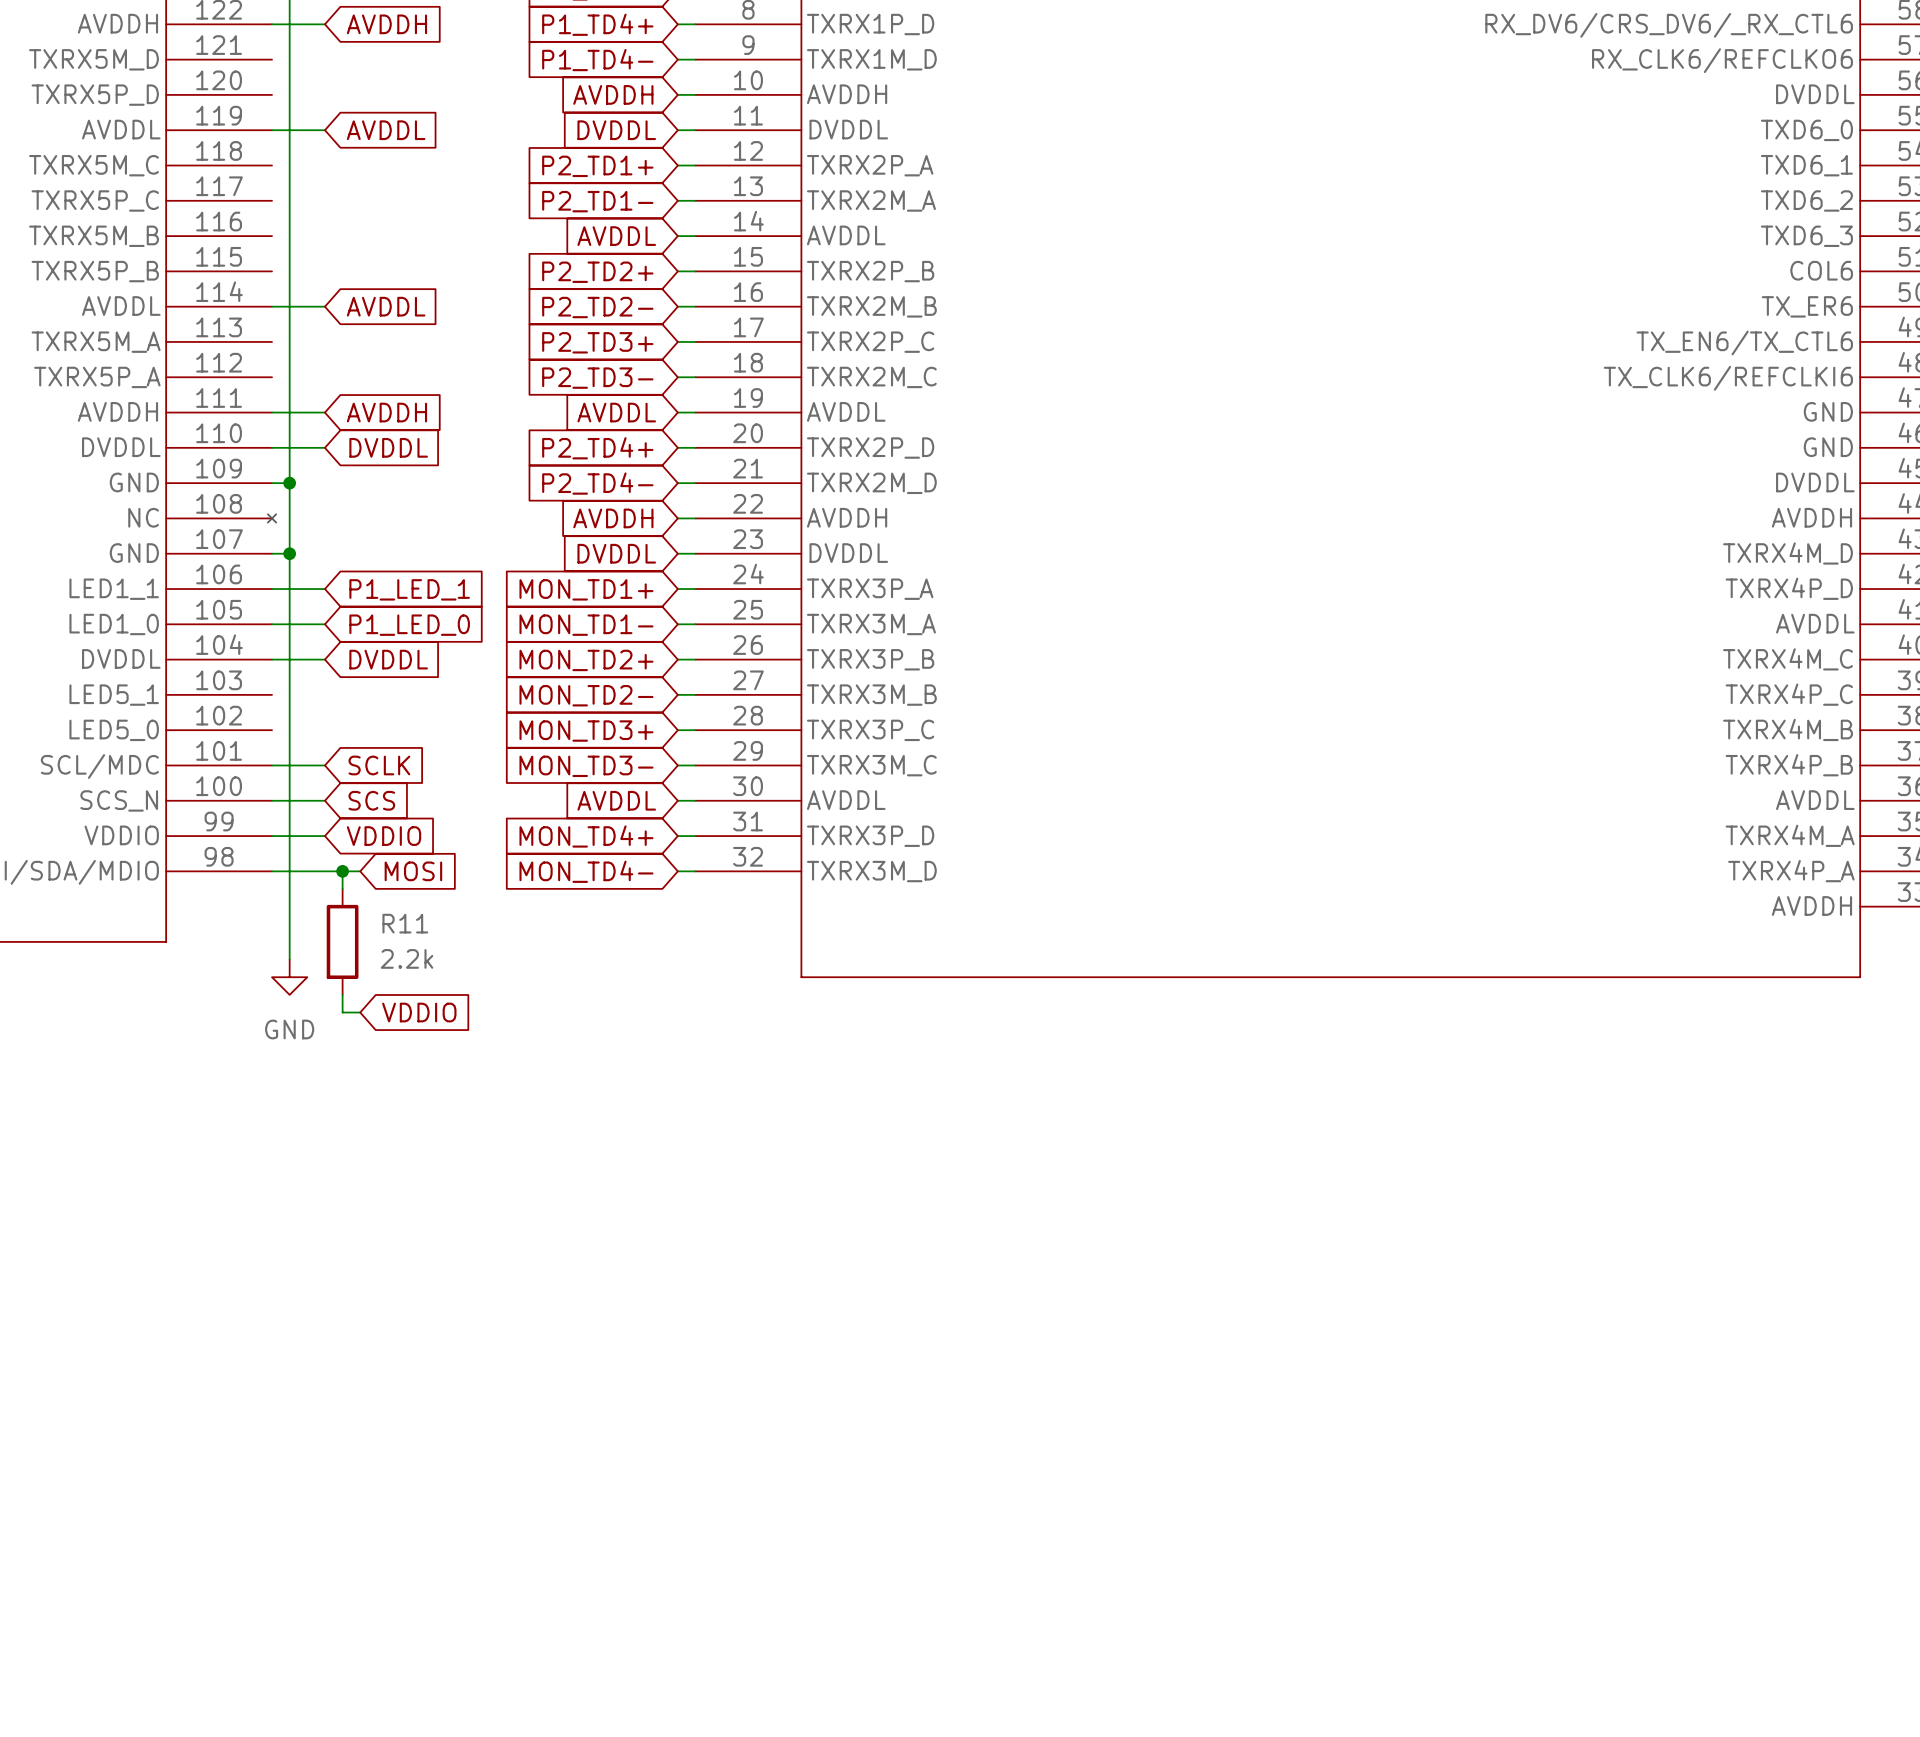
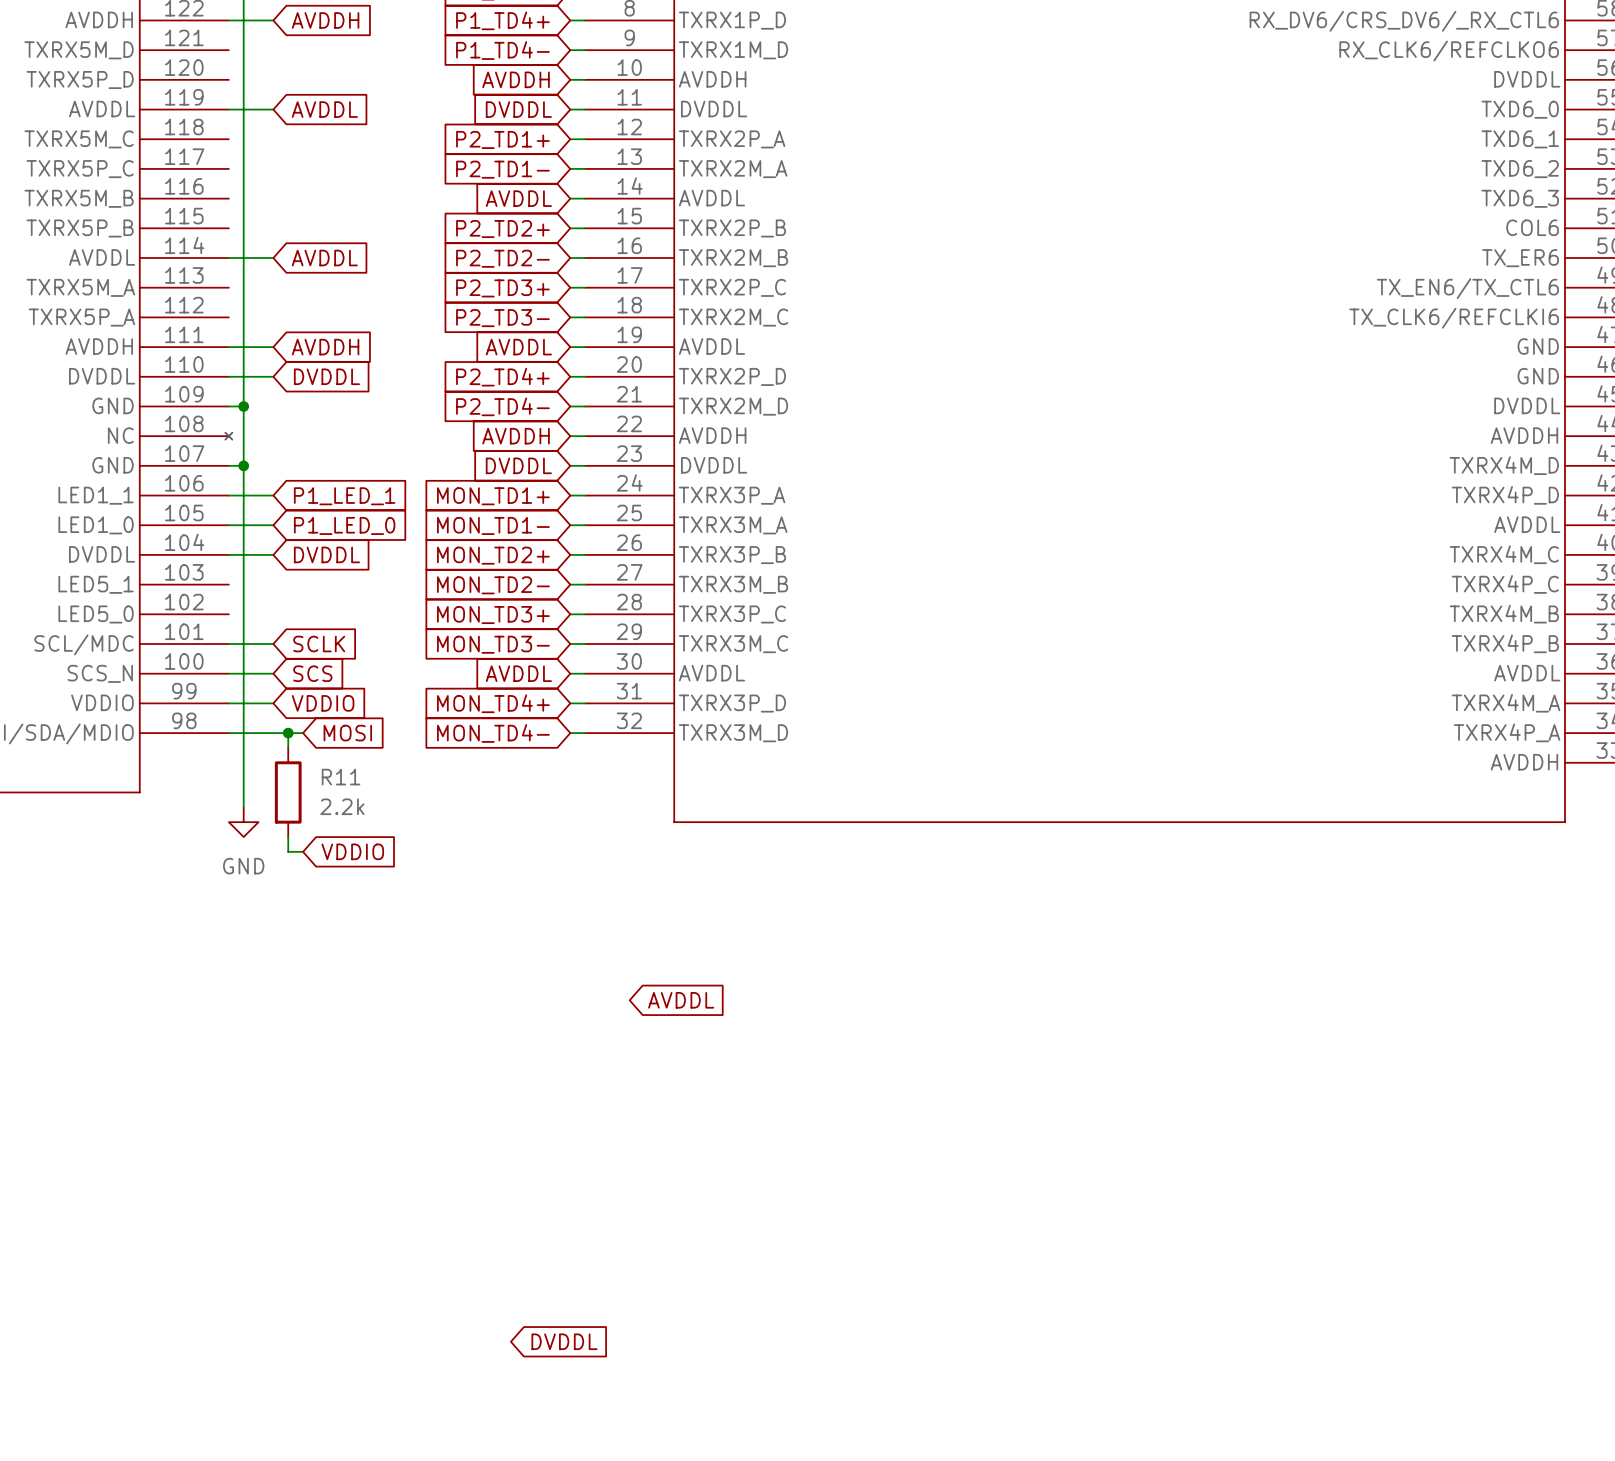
global label: none -> AVDDL (681, 1000)
global label: none -> DVDDL (564, 1341)

